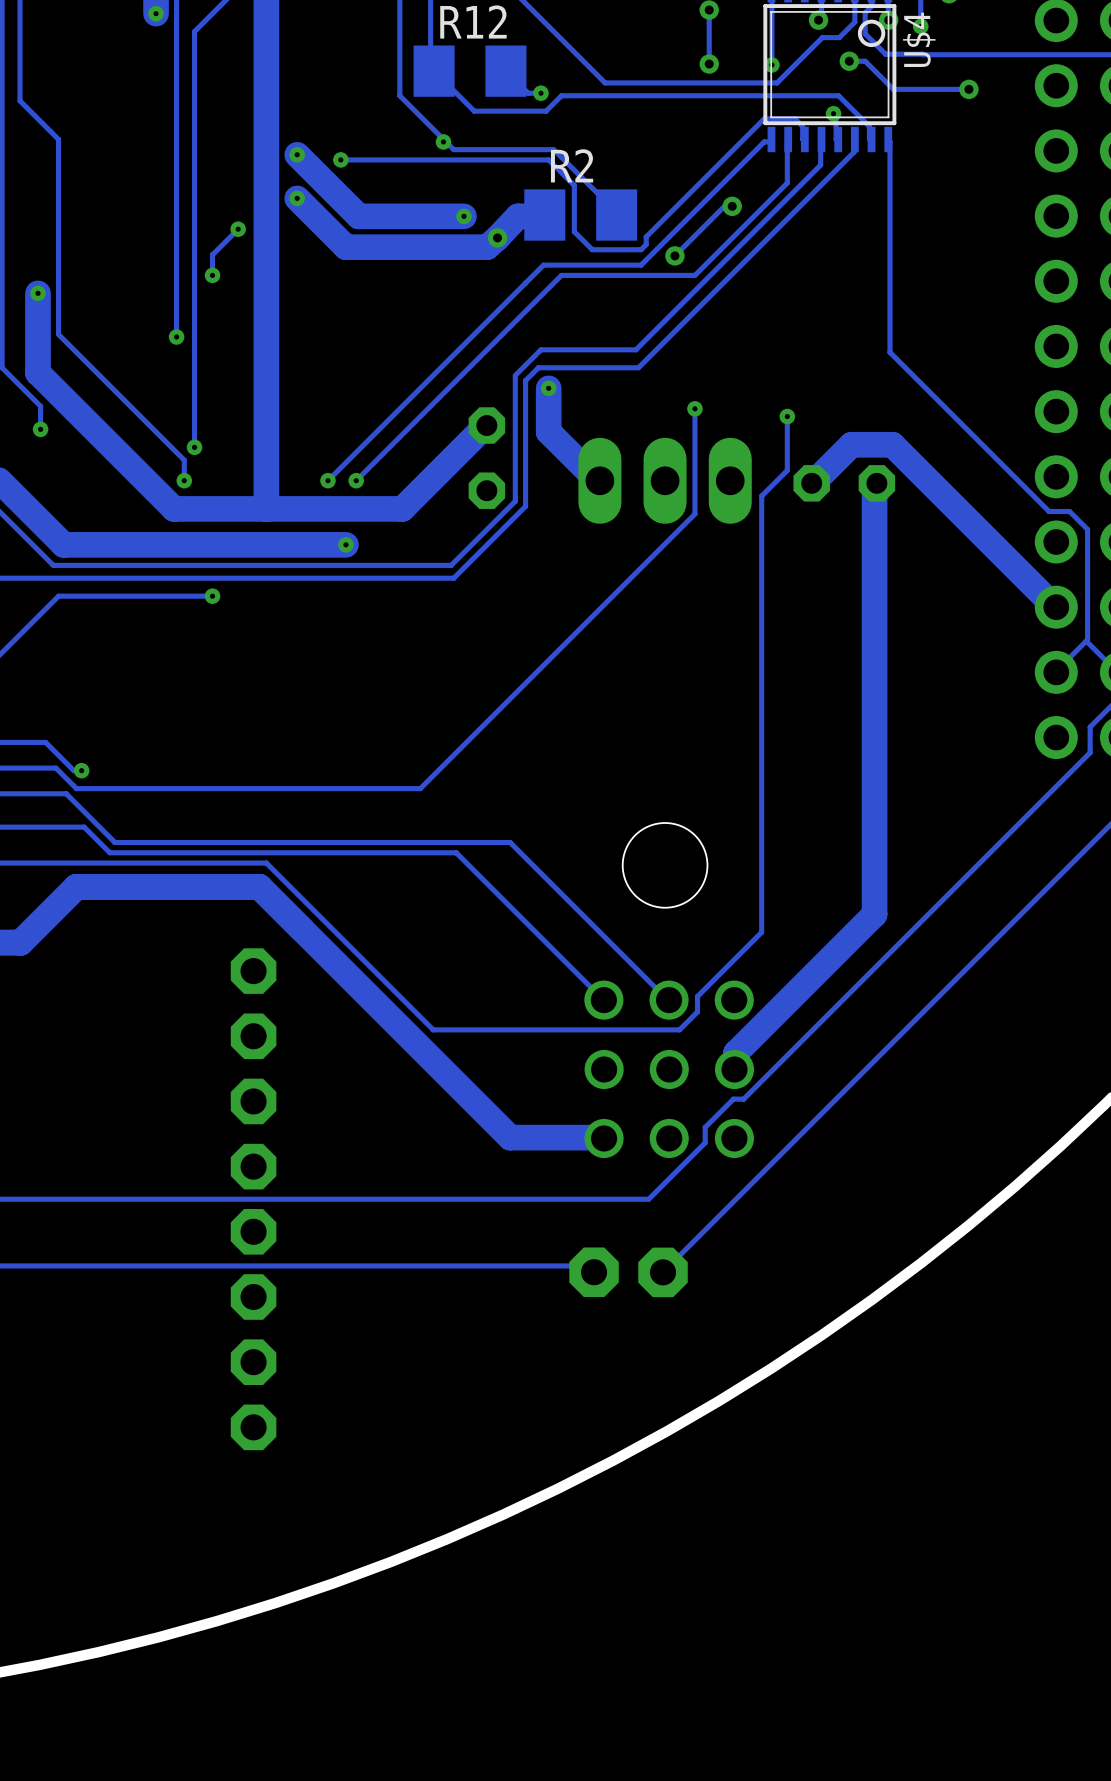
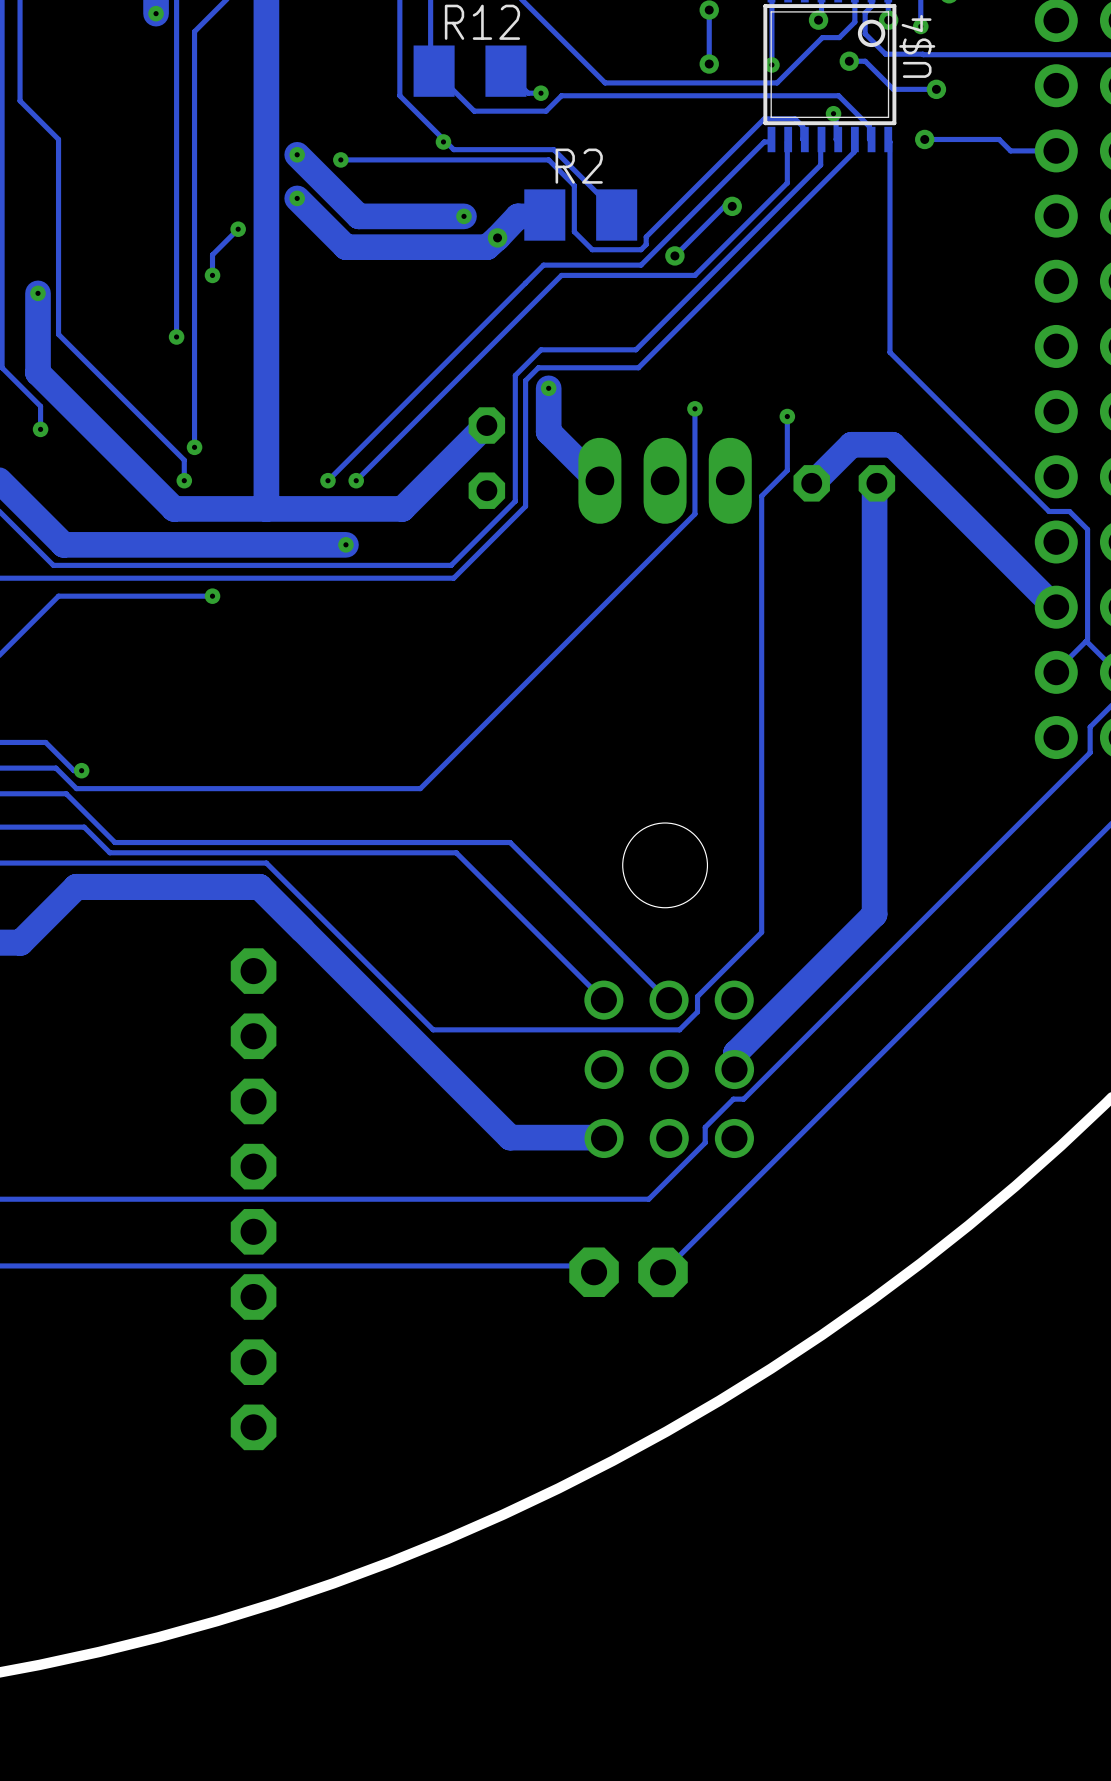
track: (968, 89) (936, 89) -> none
via position: (968, 89) -> (936, 89)
track: none -> (924, 139) (999, 139) (1010, 150) (1056, 150)
via: none -> (924, 139)

